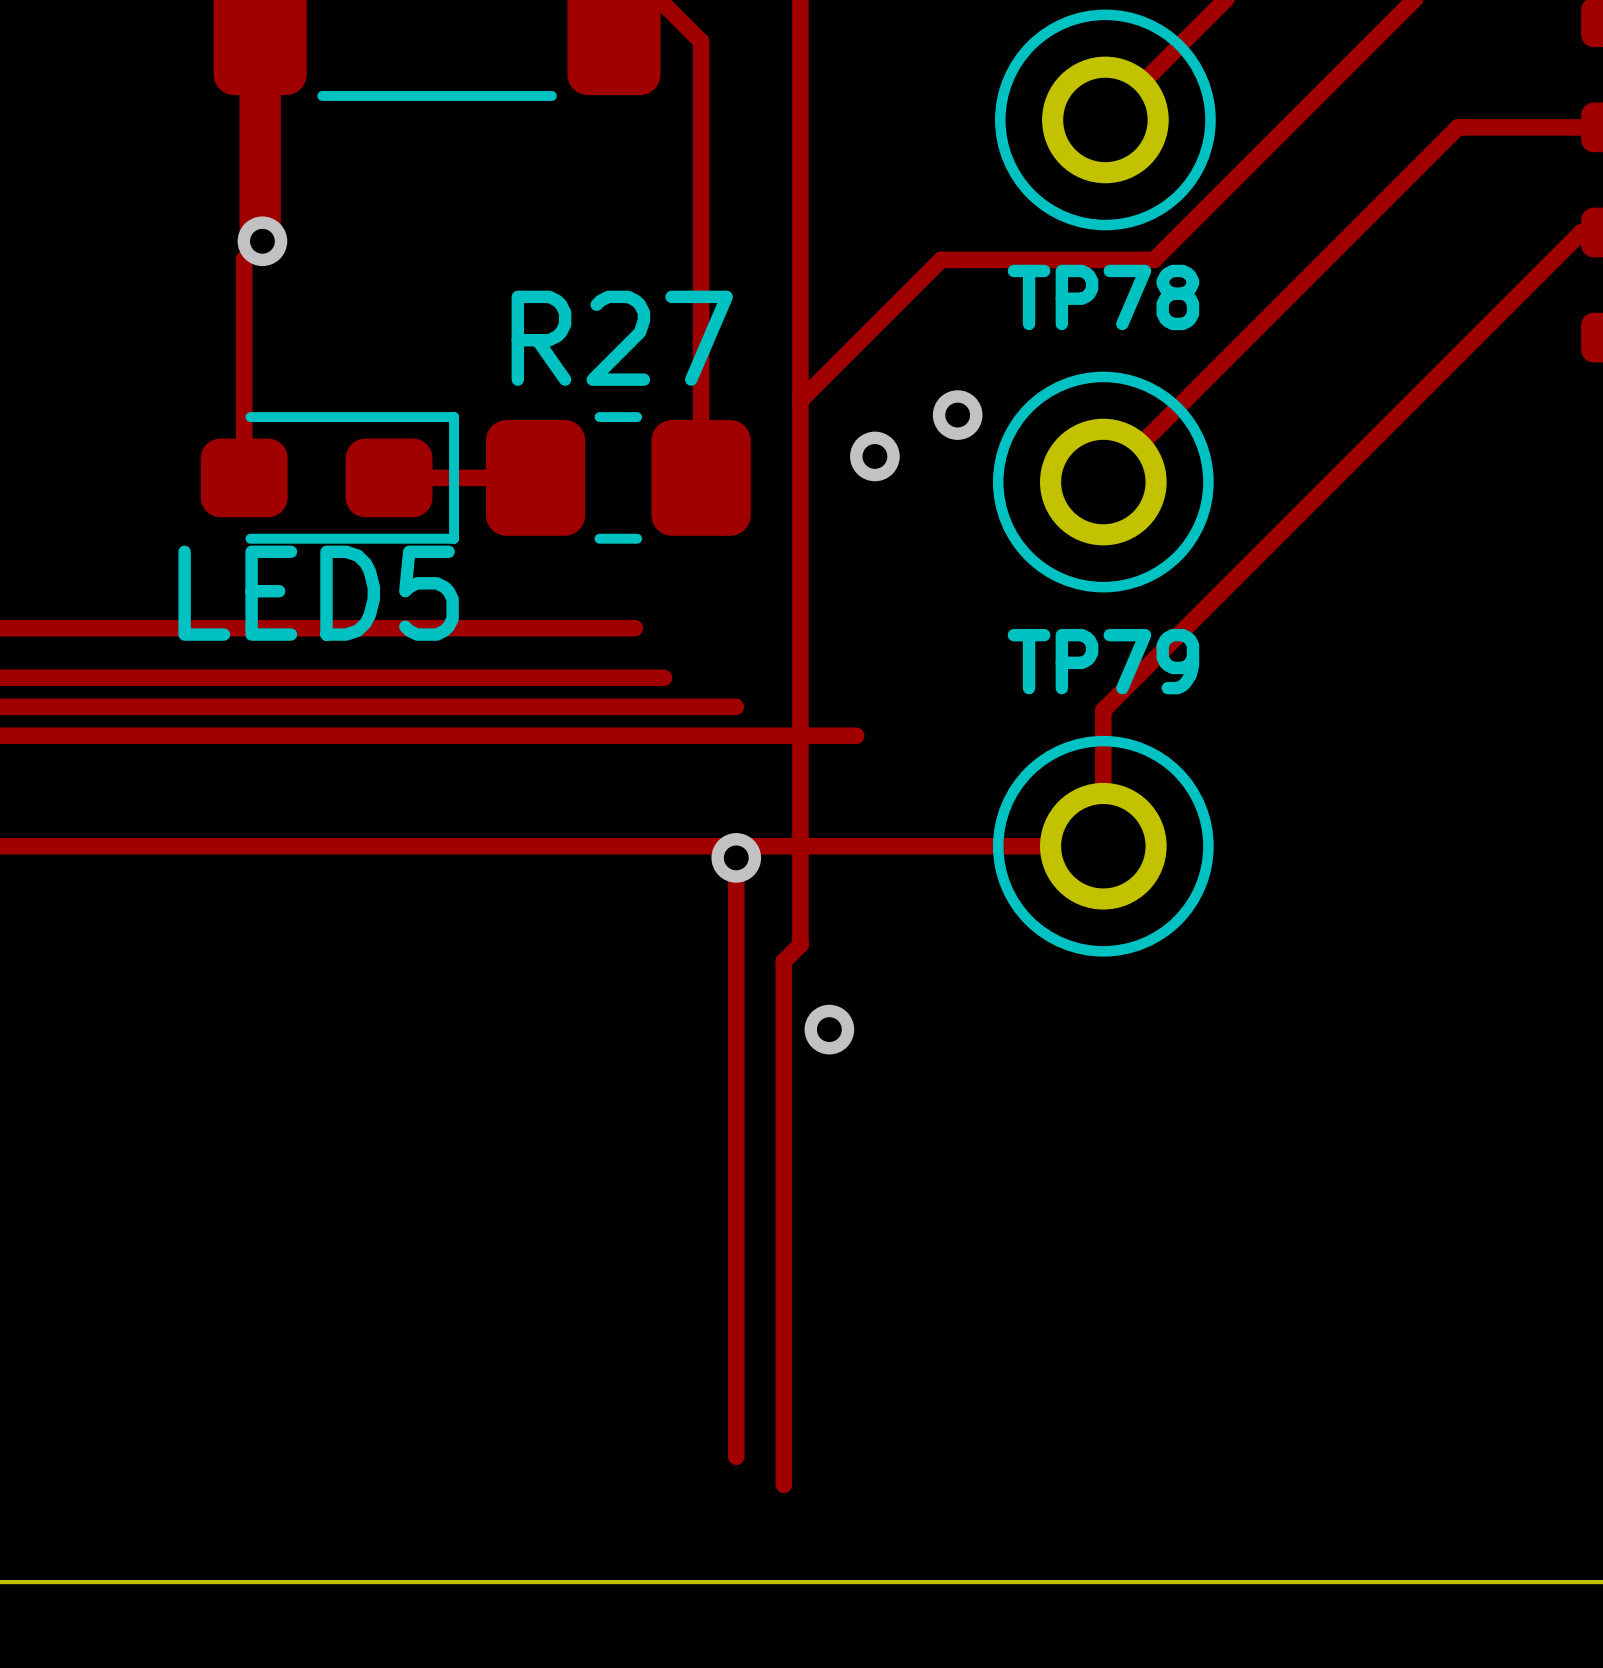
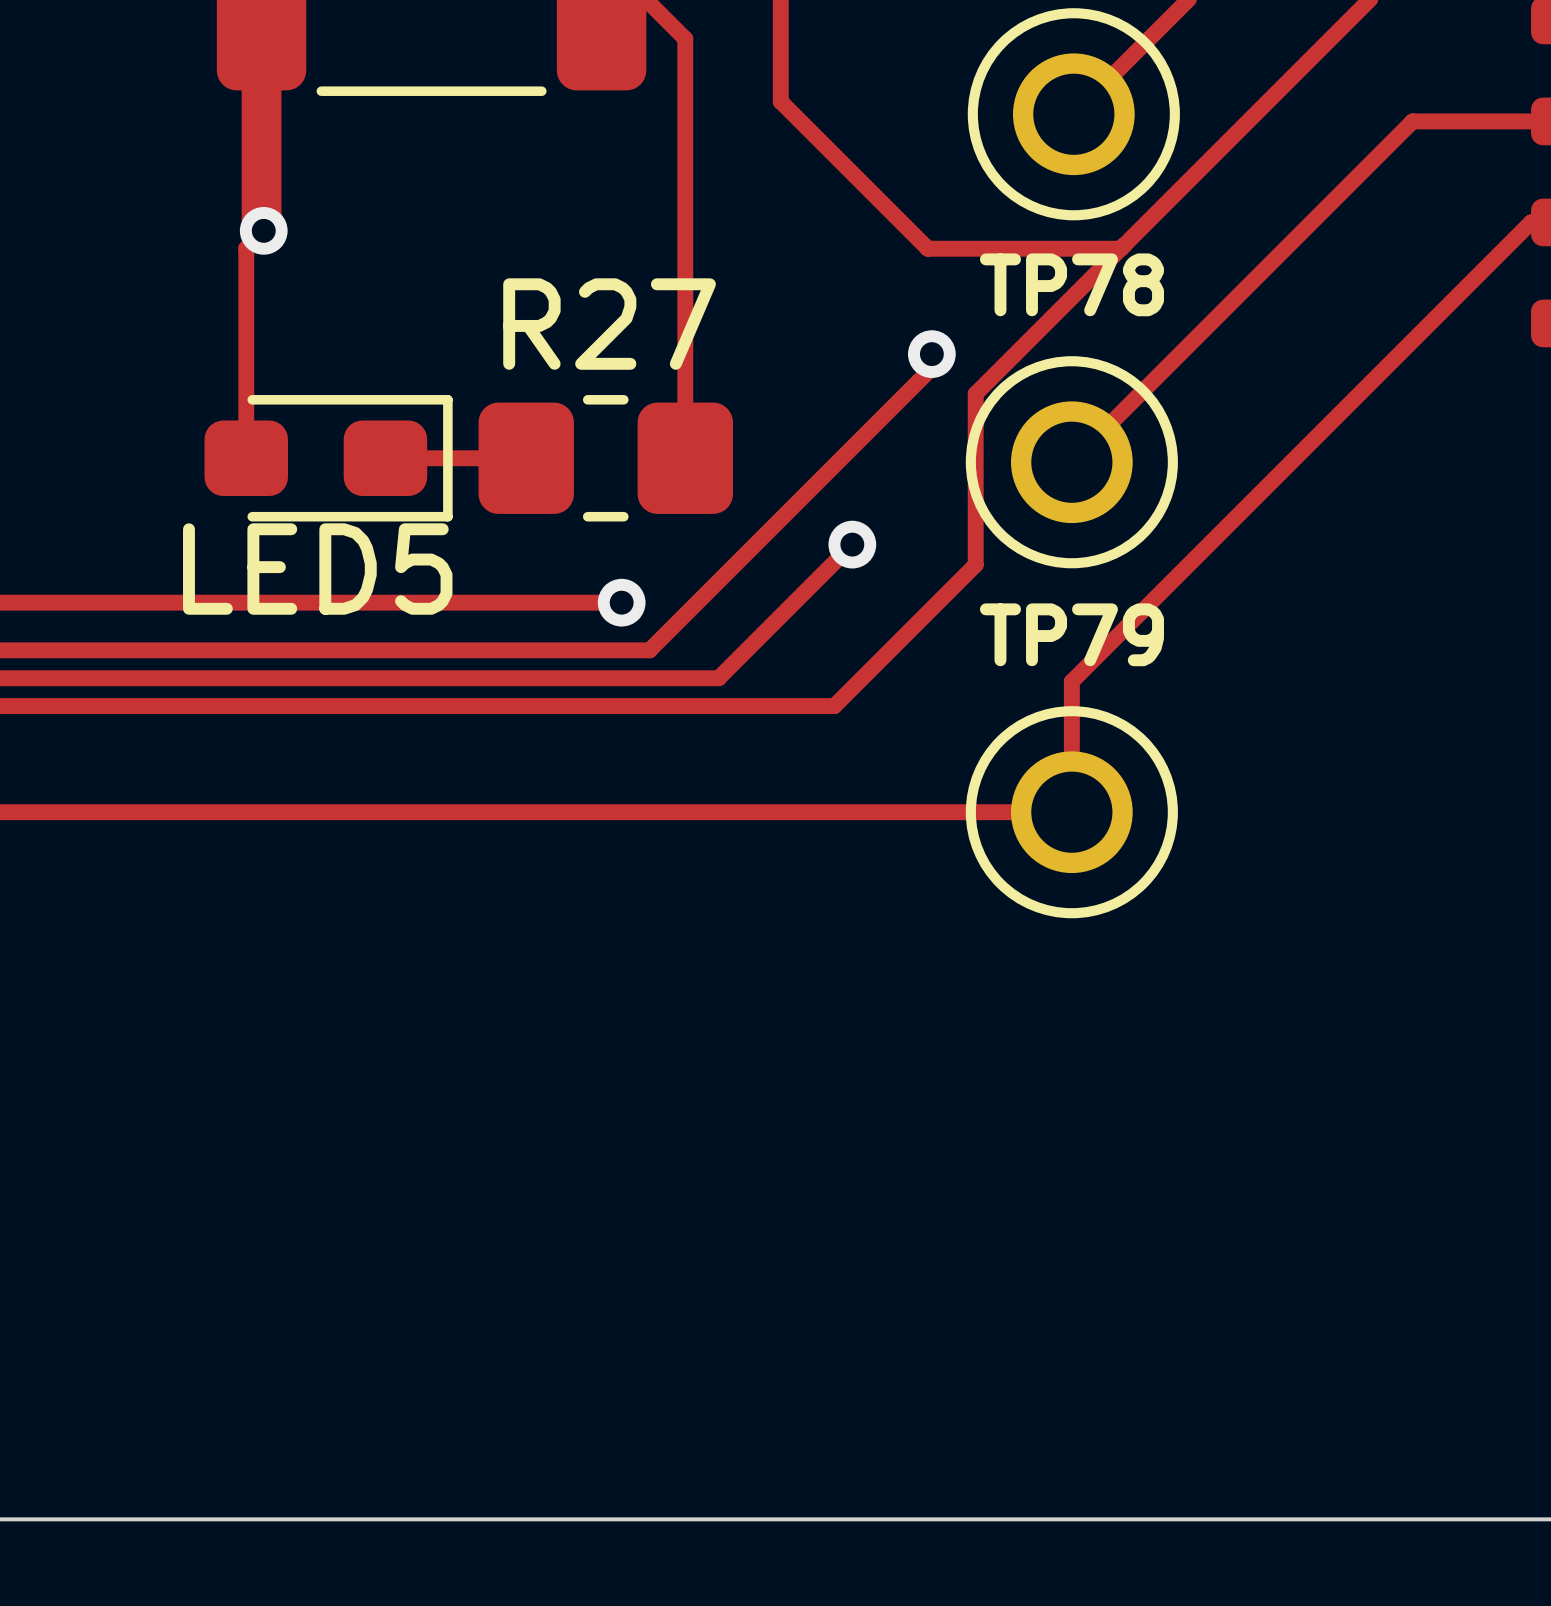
track: (800, 106) (800, 944) (783, 961) (783, 1484) -> none
track: (953, 259) (941, 259) (800, 400) -> (927, 248) (780, 101)
track: none -> (1120, 248) (975, 393) (975, 564) (834, 706)
track: none -> (931, 354) (931, 368) (649, 650)
via position: (957, 415) -> (931, 354)
via: (874, 456) -> none
track: none -> (852, 544) (718, 678)
via: none -> (852, 544)
via: none -> (621, 602)
track: (736, 857) (736, 1456) -> none
via: (736, 857) -> none
via: (829, 1029) -> none

